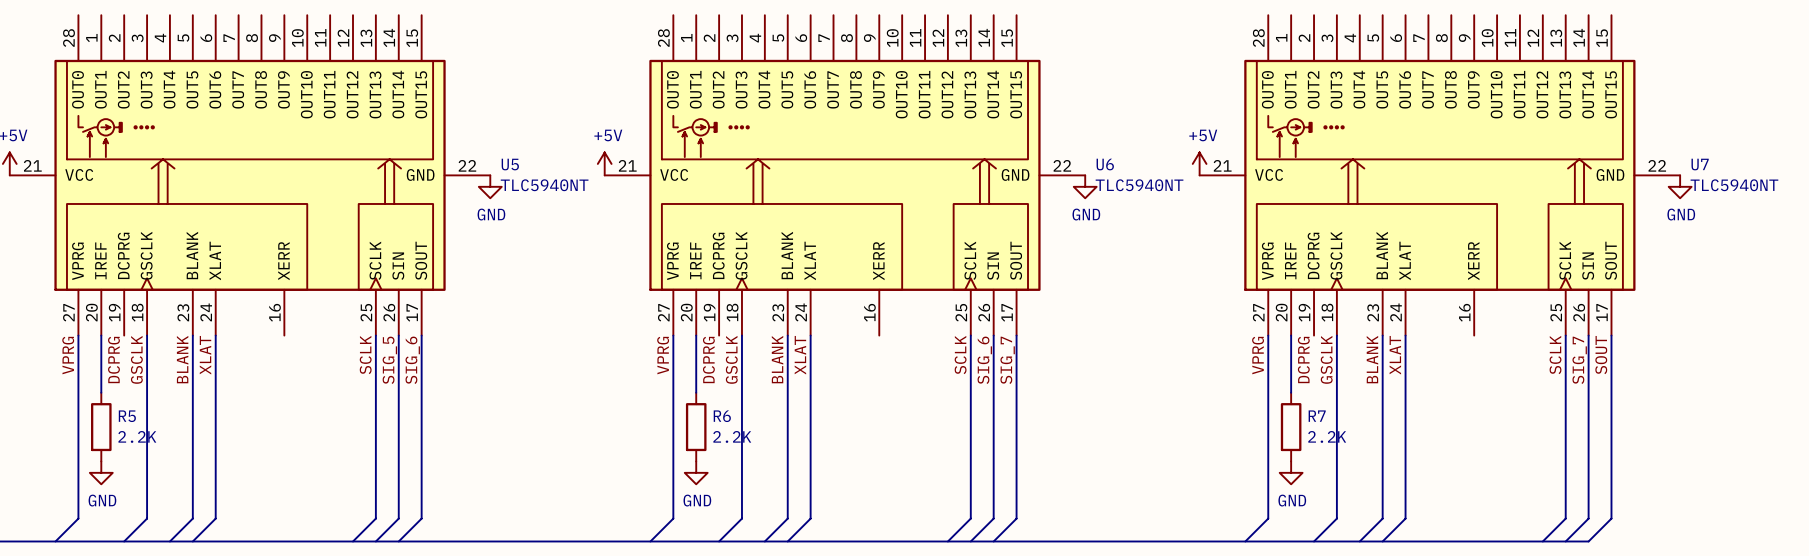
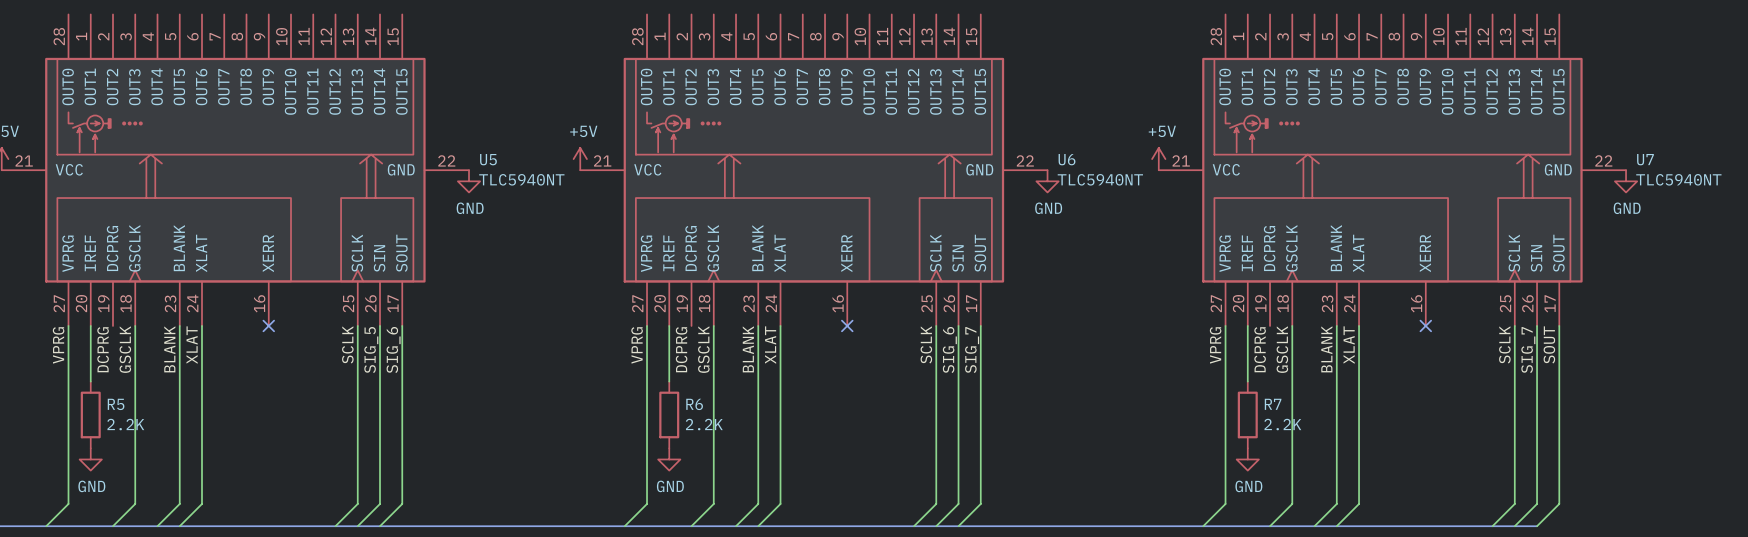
no-connect mark: none -> (268, 325)
no-connect mark: none -> (847, 325)
no-connect mark: none -> (1425, 325)

